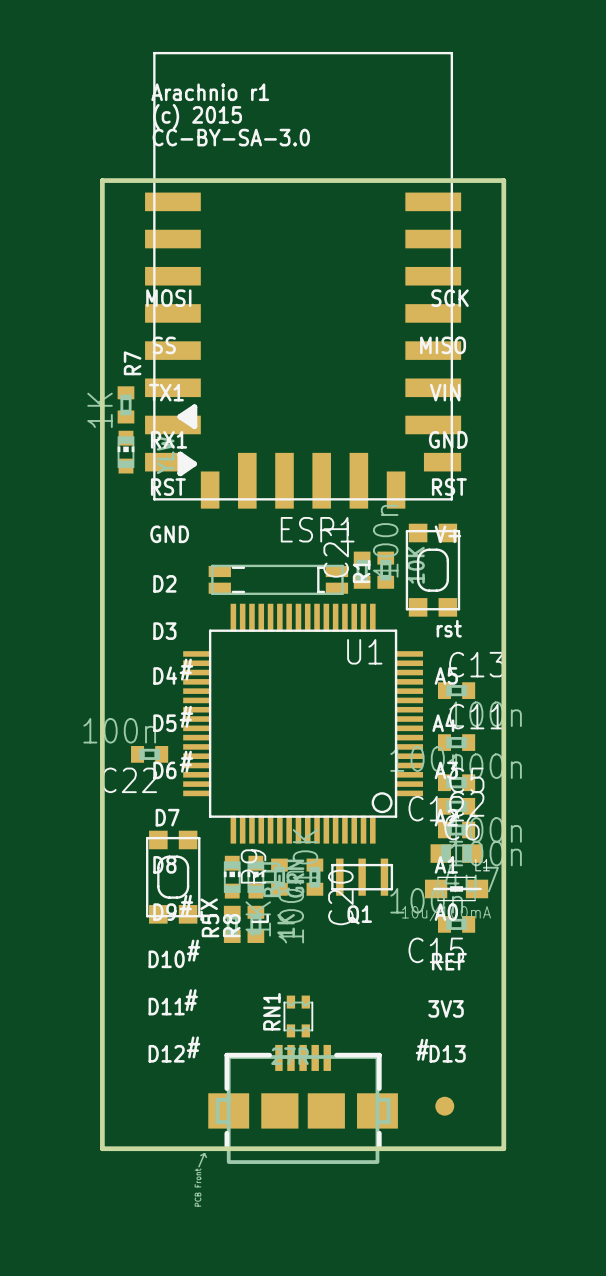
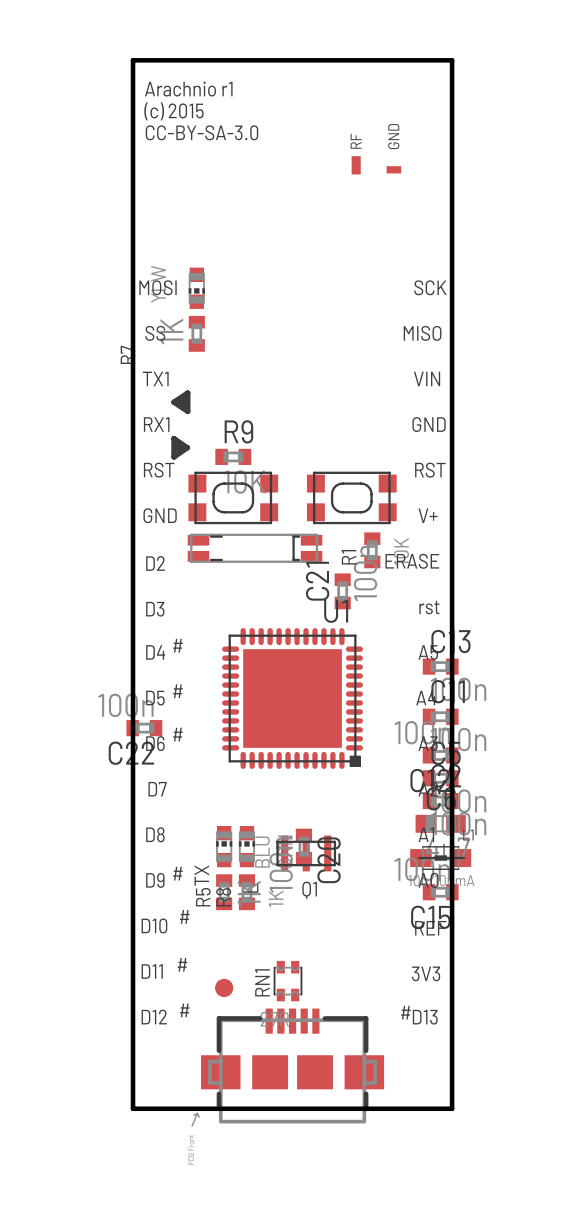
part: none -> (376, 165)
ESP1: (303, 280) -> none
R7 position: (125, 404) -> (196, 333)
part rotation: 0° (125, 452) -> 180° (196, 288)
part position: (125, 452) -> (196, 288)
part: none -> (233, 497)
C21 position: (362, 570) -> (342, 591)
part rotation: 0° (432, 570) -> 90° clockwise (351, 497)
part position: (432, 570) -> (351, 497)
part position: (278, 579) -> (255, 548)
text: none -> ERASE (412, 561)
U1 footprint: [183, 603, 424, 844] -> [222, 628, 363, 769]
part: (173, 877) -> none
R9 rotation: 0° (279, 877) -> 90° clockwise (233, 456)
R9 position: (279, 877) -> (233, 456)
Q1 position: (362, 877) -> (306, 853)
part position: (444, 1106) -> (224, 987)
board edge: (137, 1148) (102, 1148) (102, 180) (503, 180) (503, 1148) (468, 1148) -> (133, 1108) (133, 60) (452, 60) (452, 1108)

